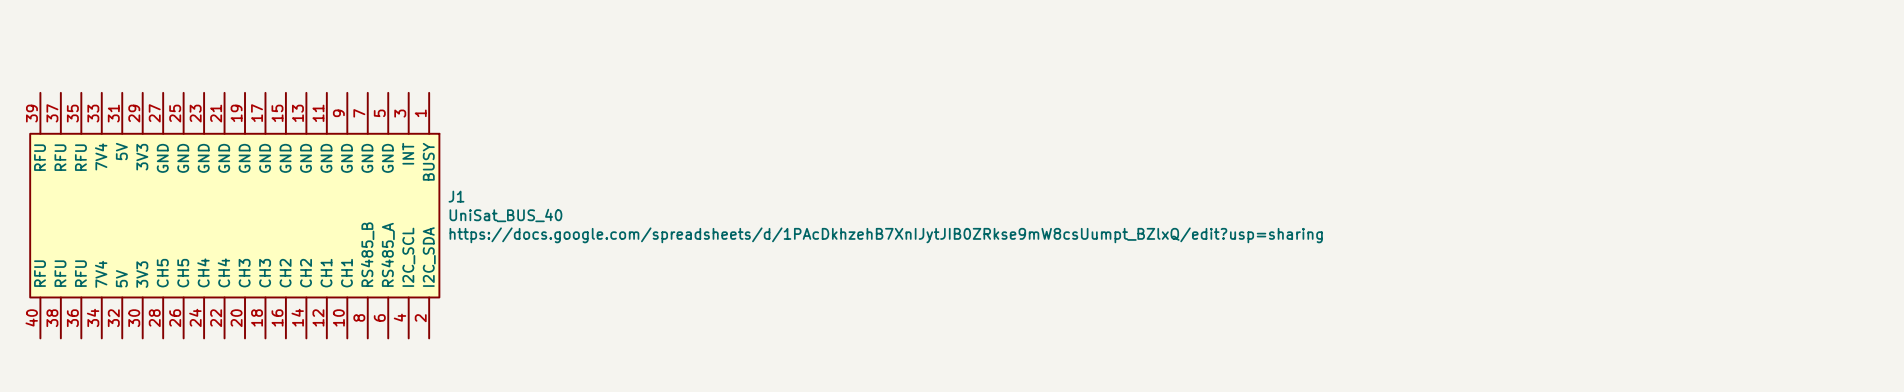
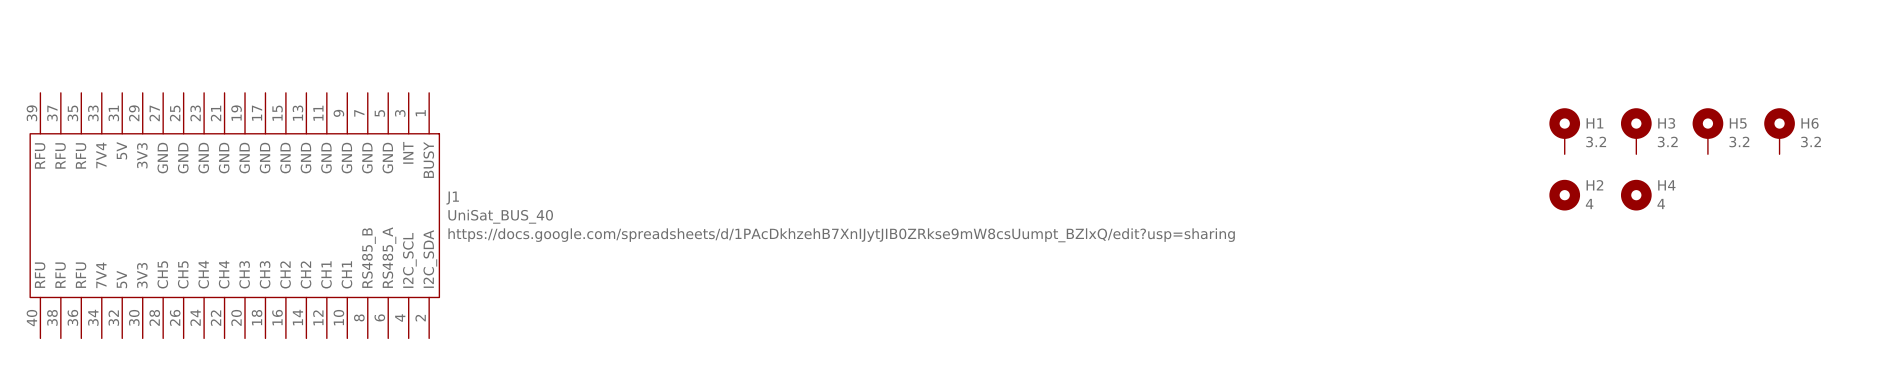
H1: none -> 3.2 (1564, 131)
H3: none -> 3.2 (1636, 131)
H5: none -> 3.2 (1707, 131)
H6: none -> 3.2 (1779, 131)
H2: none -> 4 (1564, 195)
H4: none -> 4 (1636, 195)

